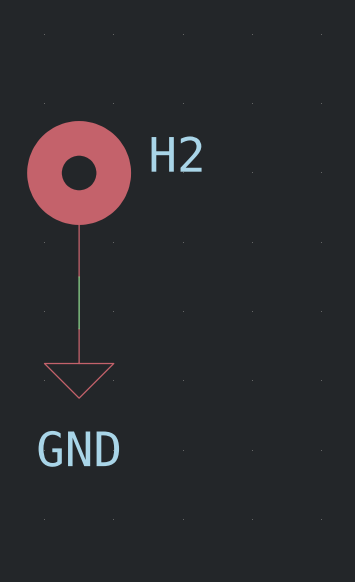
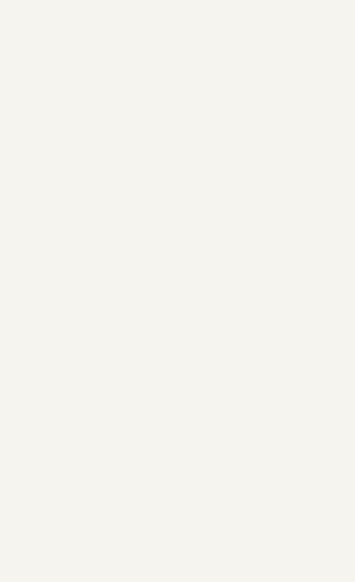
H2: (79, 198) -> none
wire: (79, 276) (79, 328) -> none
power symbol: GND (79, 363) -> none

